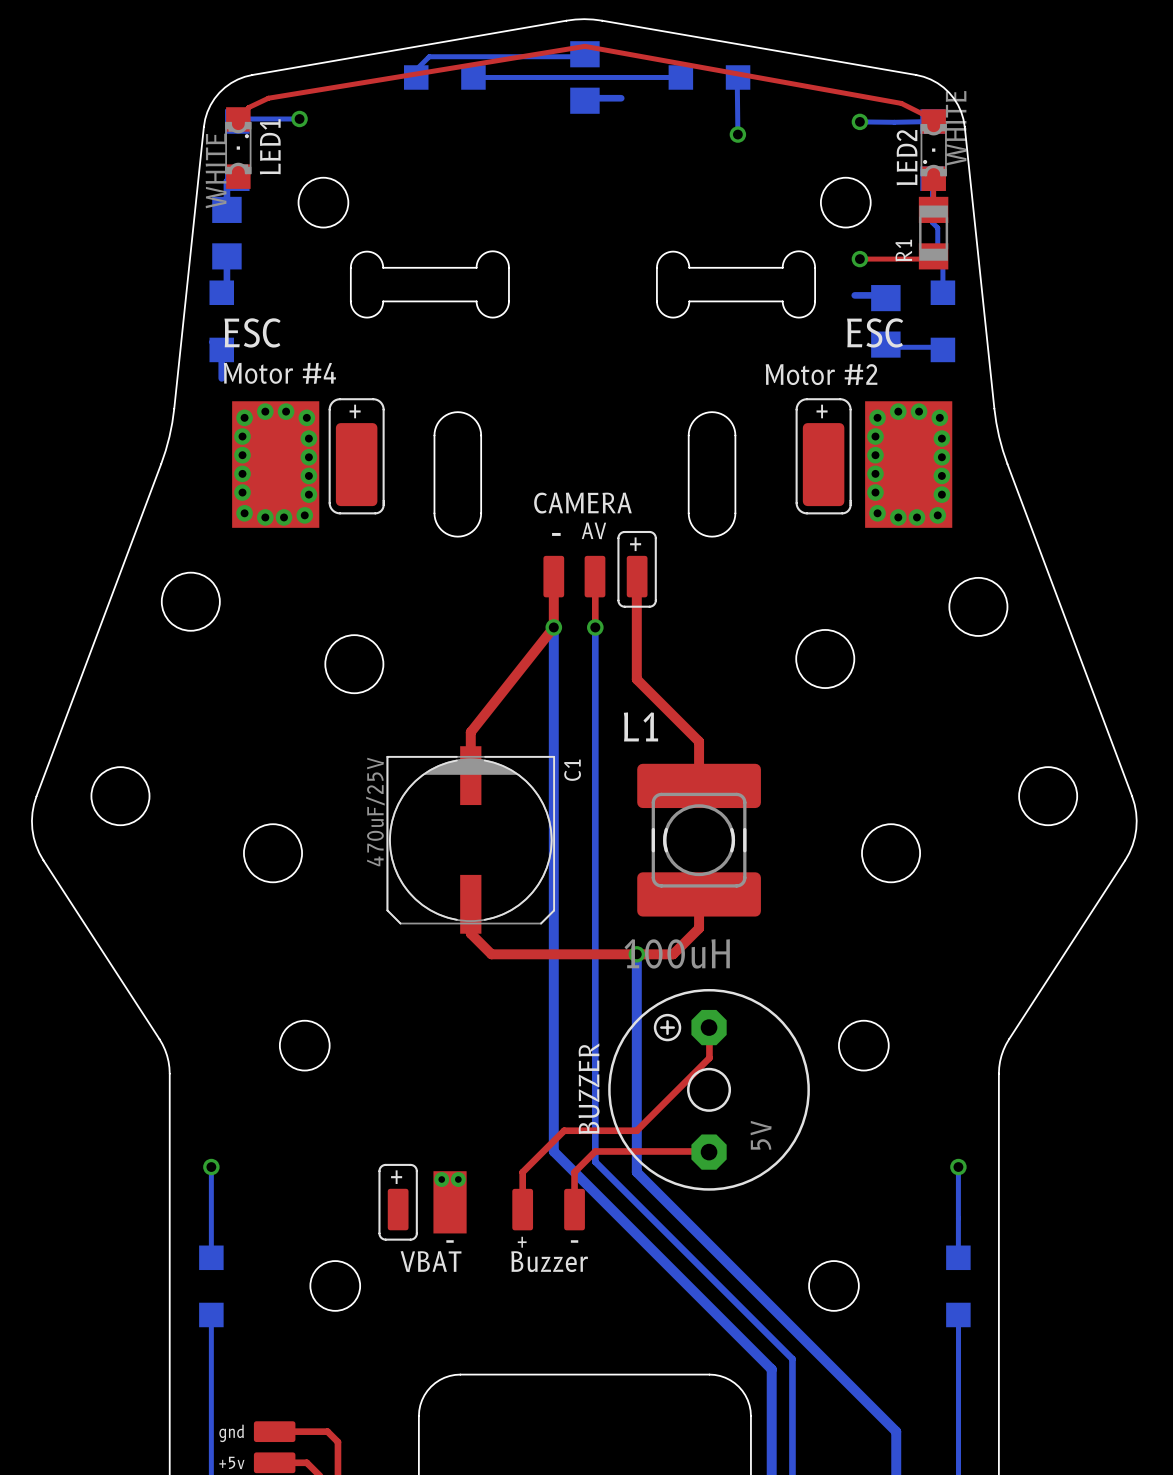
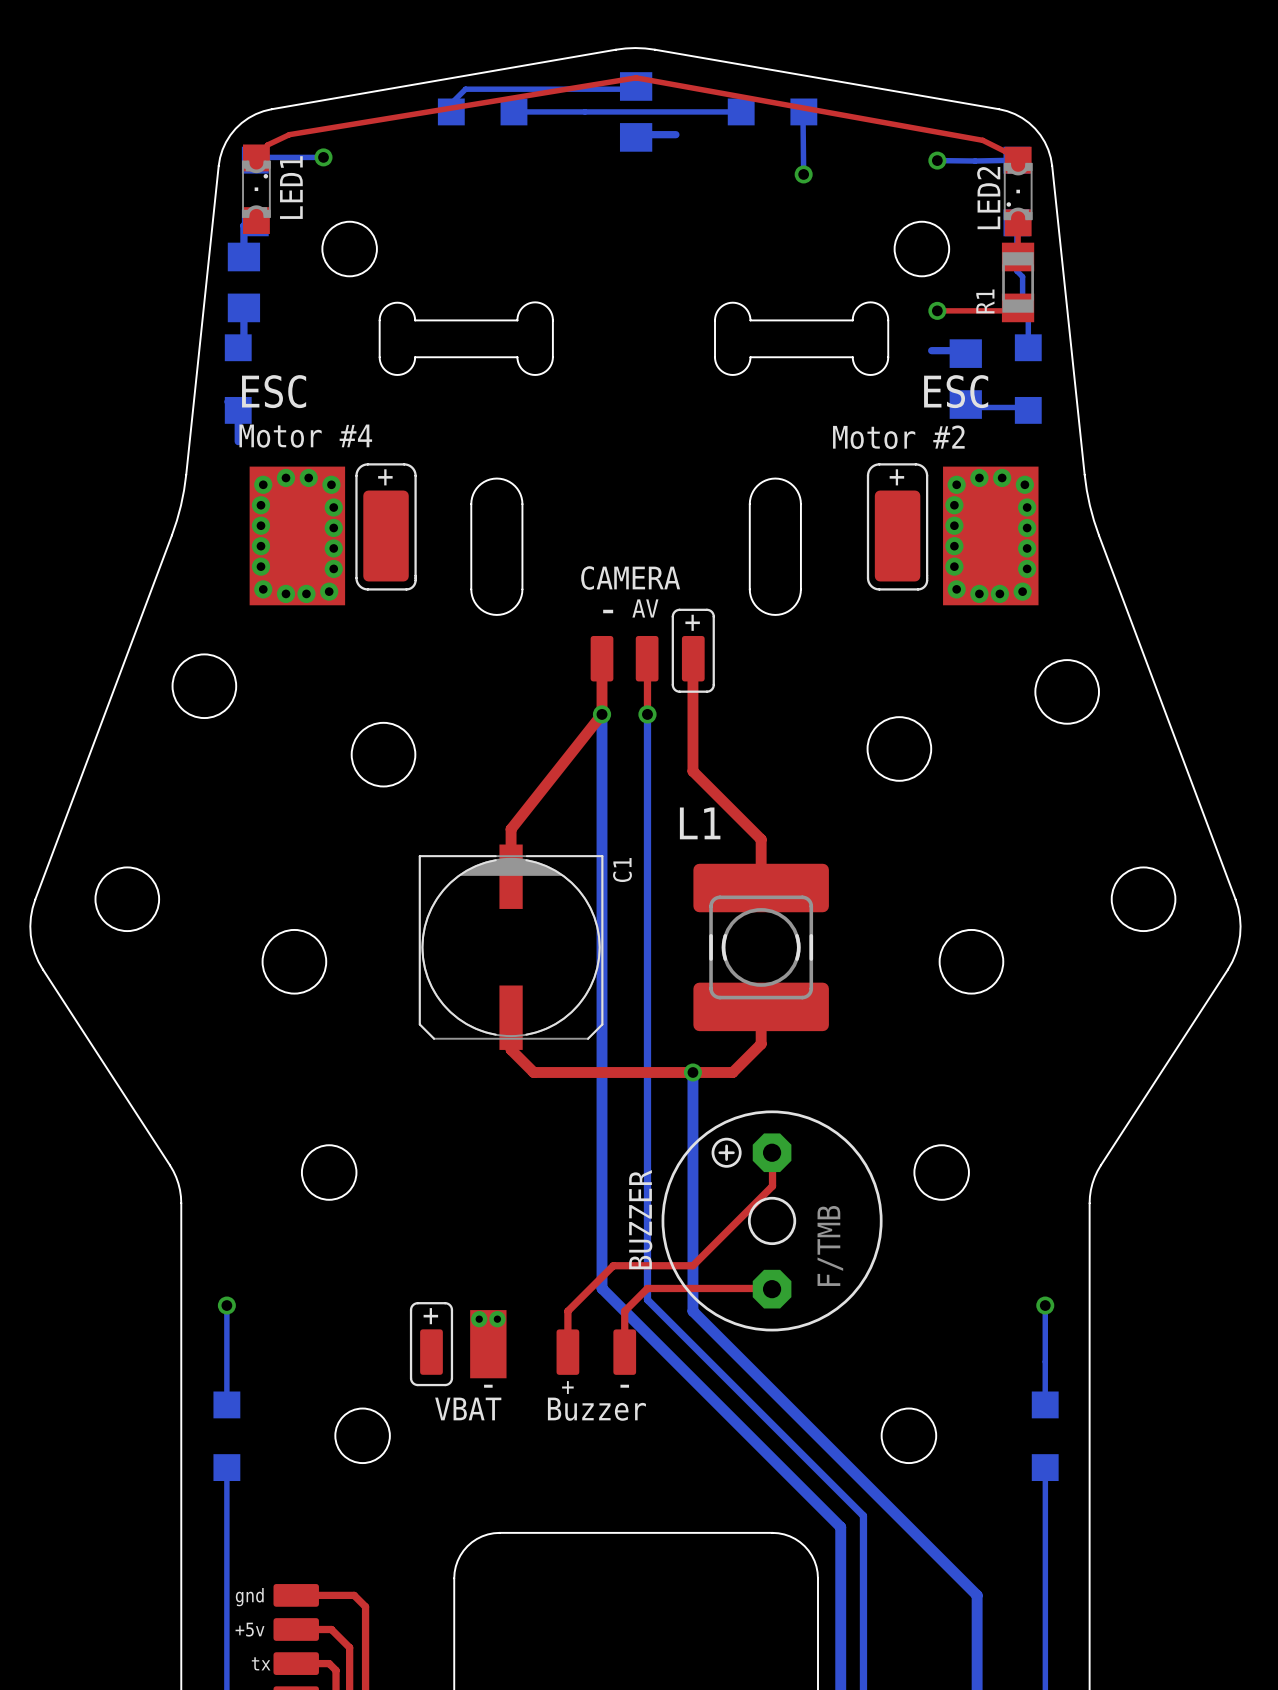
LED2 value: WHITE (956, 128) -> none
LED1 value: WHITE (216, 170) -> none
C1 value: 470uF/25V (375, 812) -> none
L1 value: 100uH (677, 953) -> none
BUZZER value: 5V (761, 1135) -> F/TMB (830, 1245)

